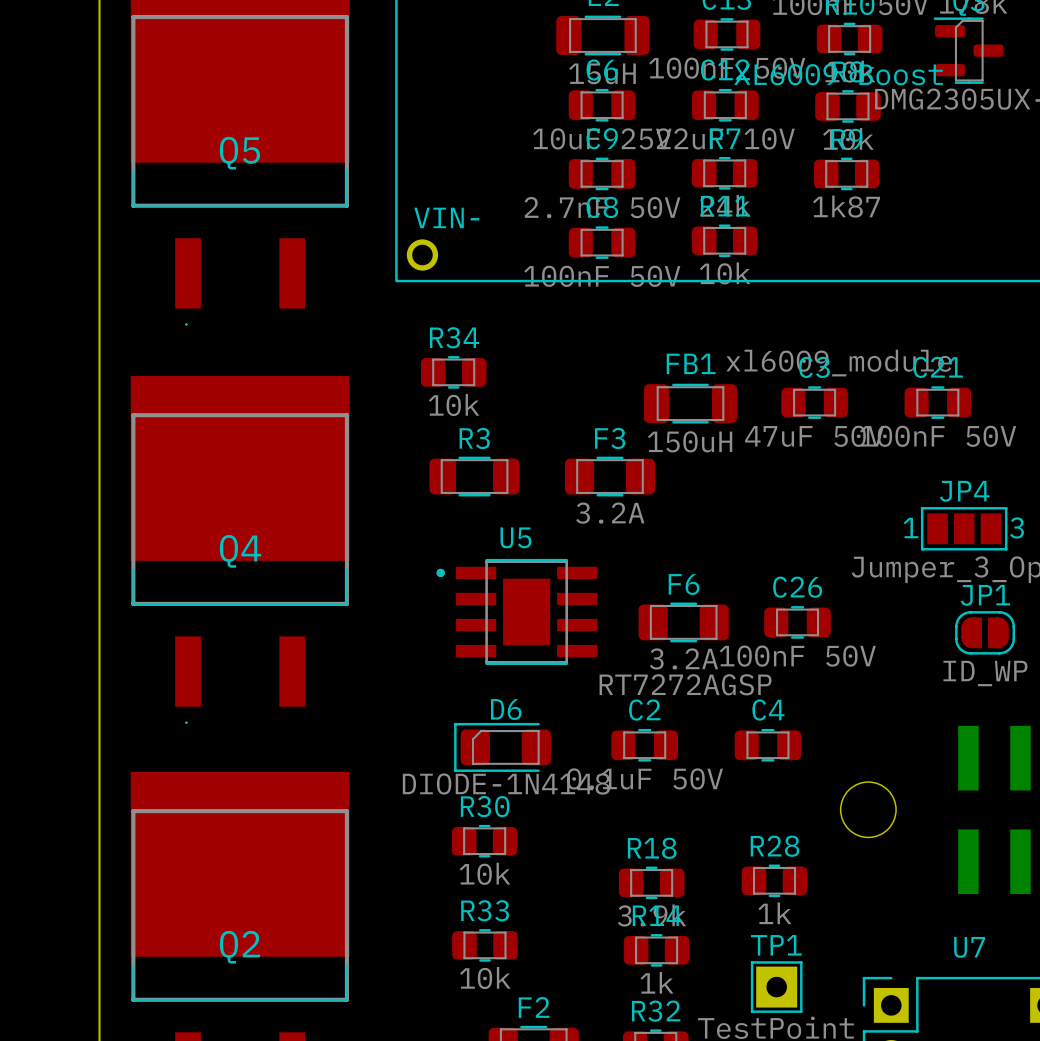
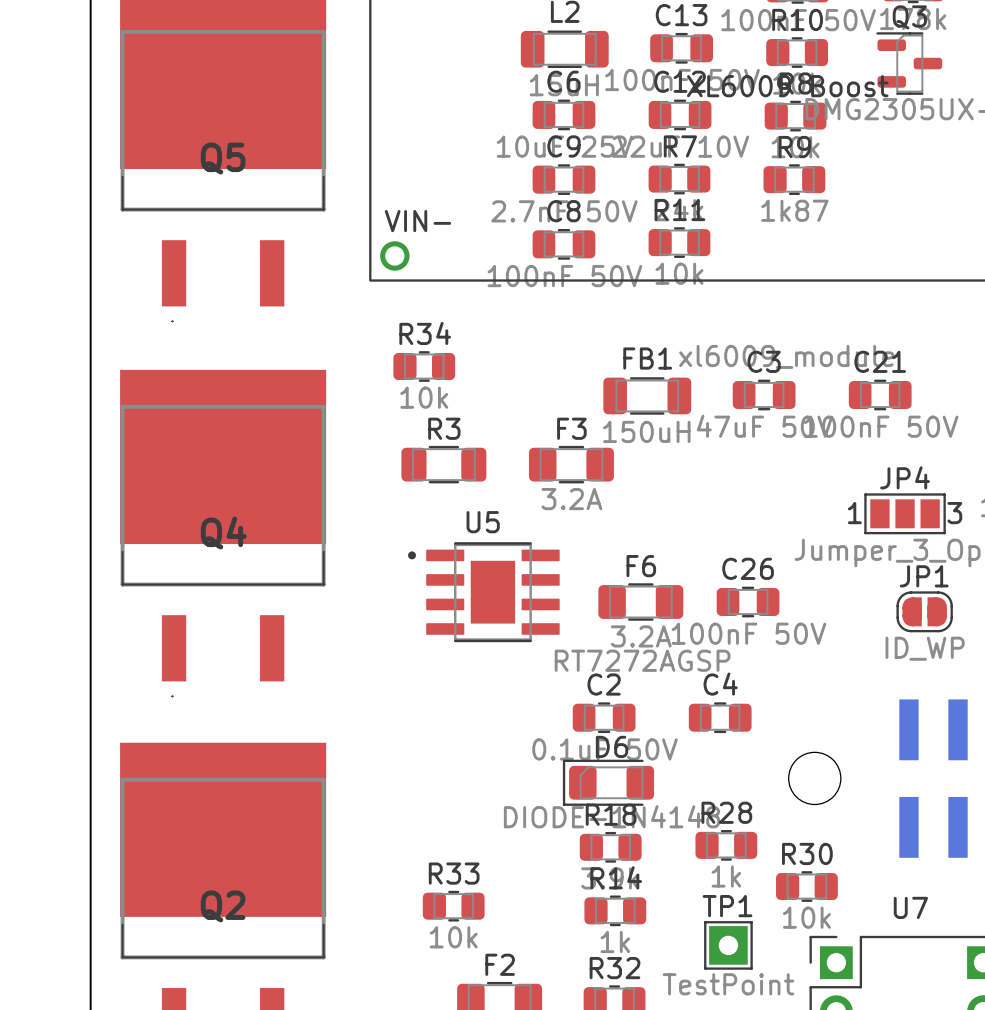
D6 position: (502, 747) -> (608, 782)
R30 position: (484, 841) -> (806, 886)

